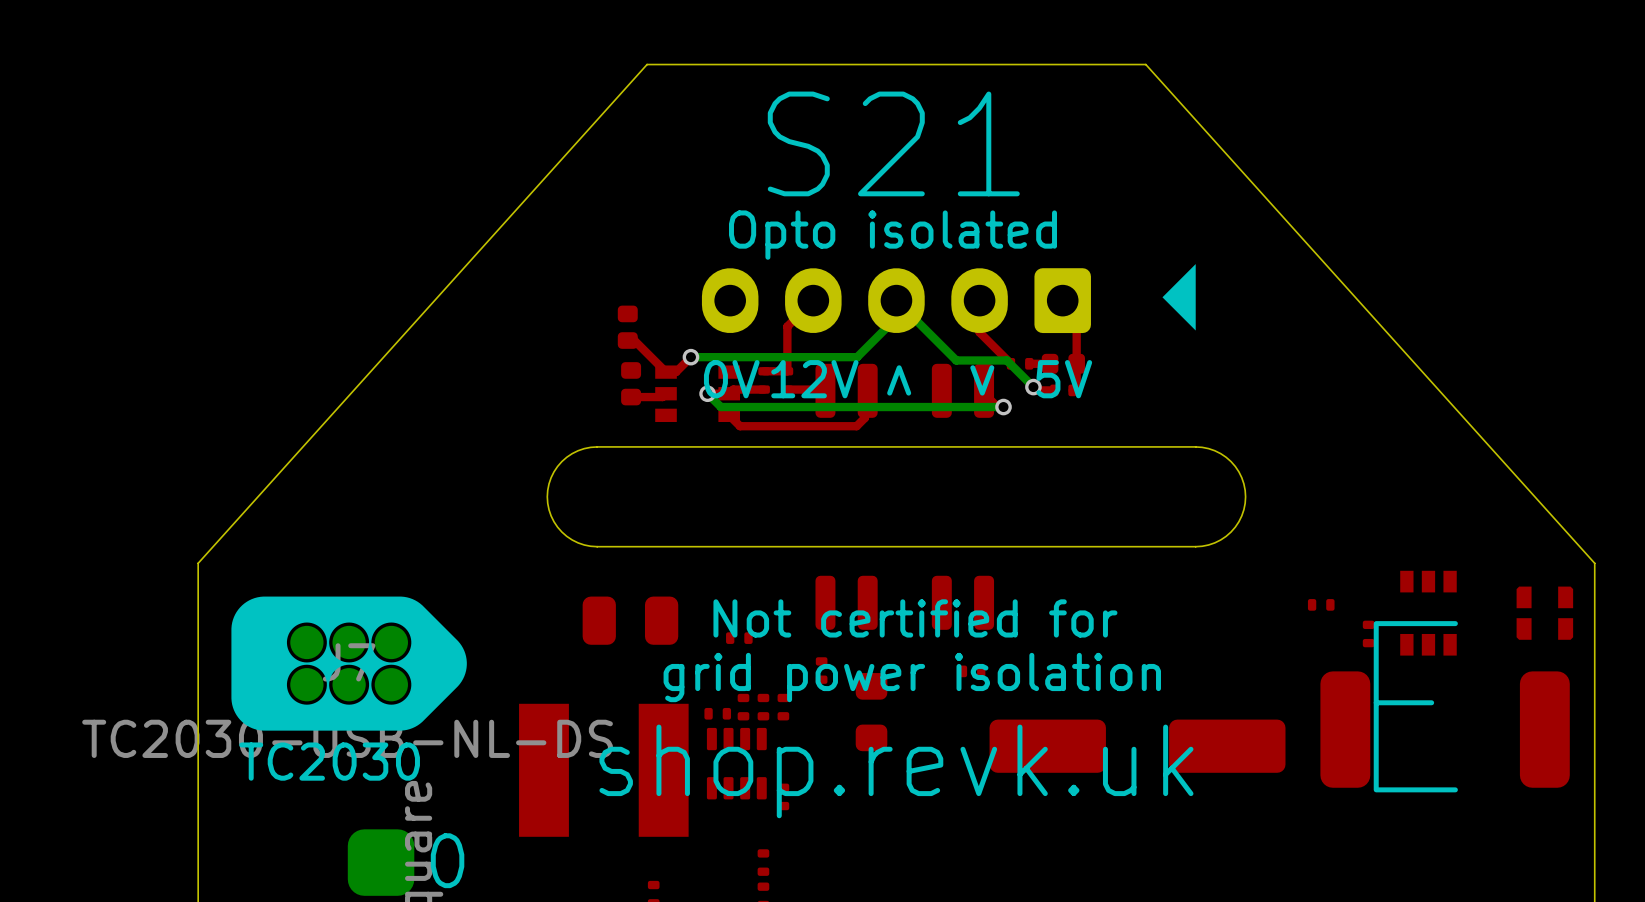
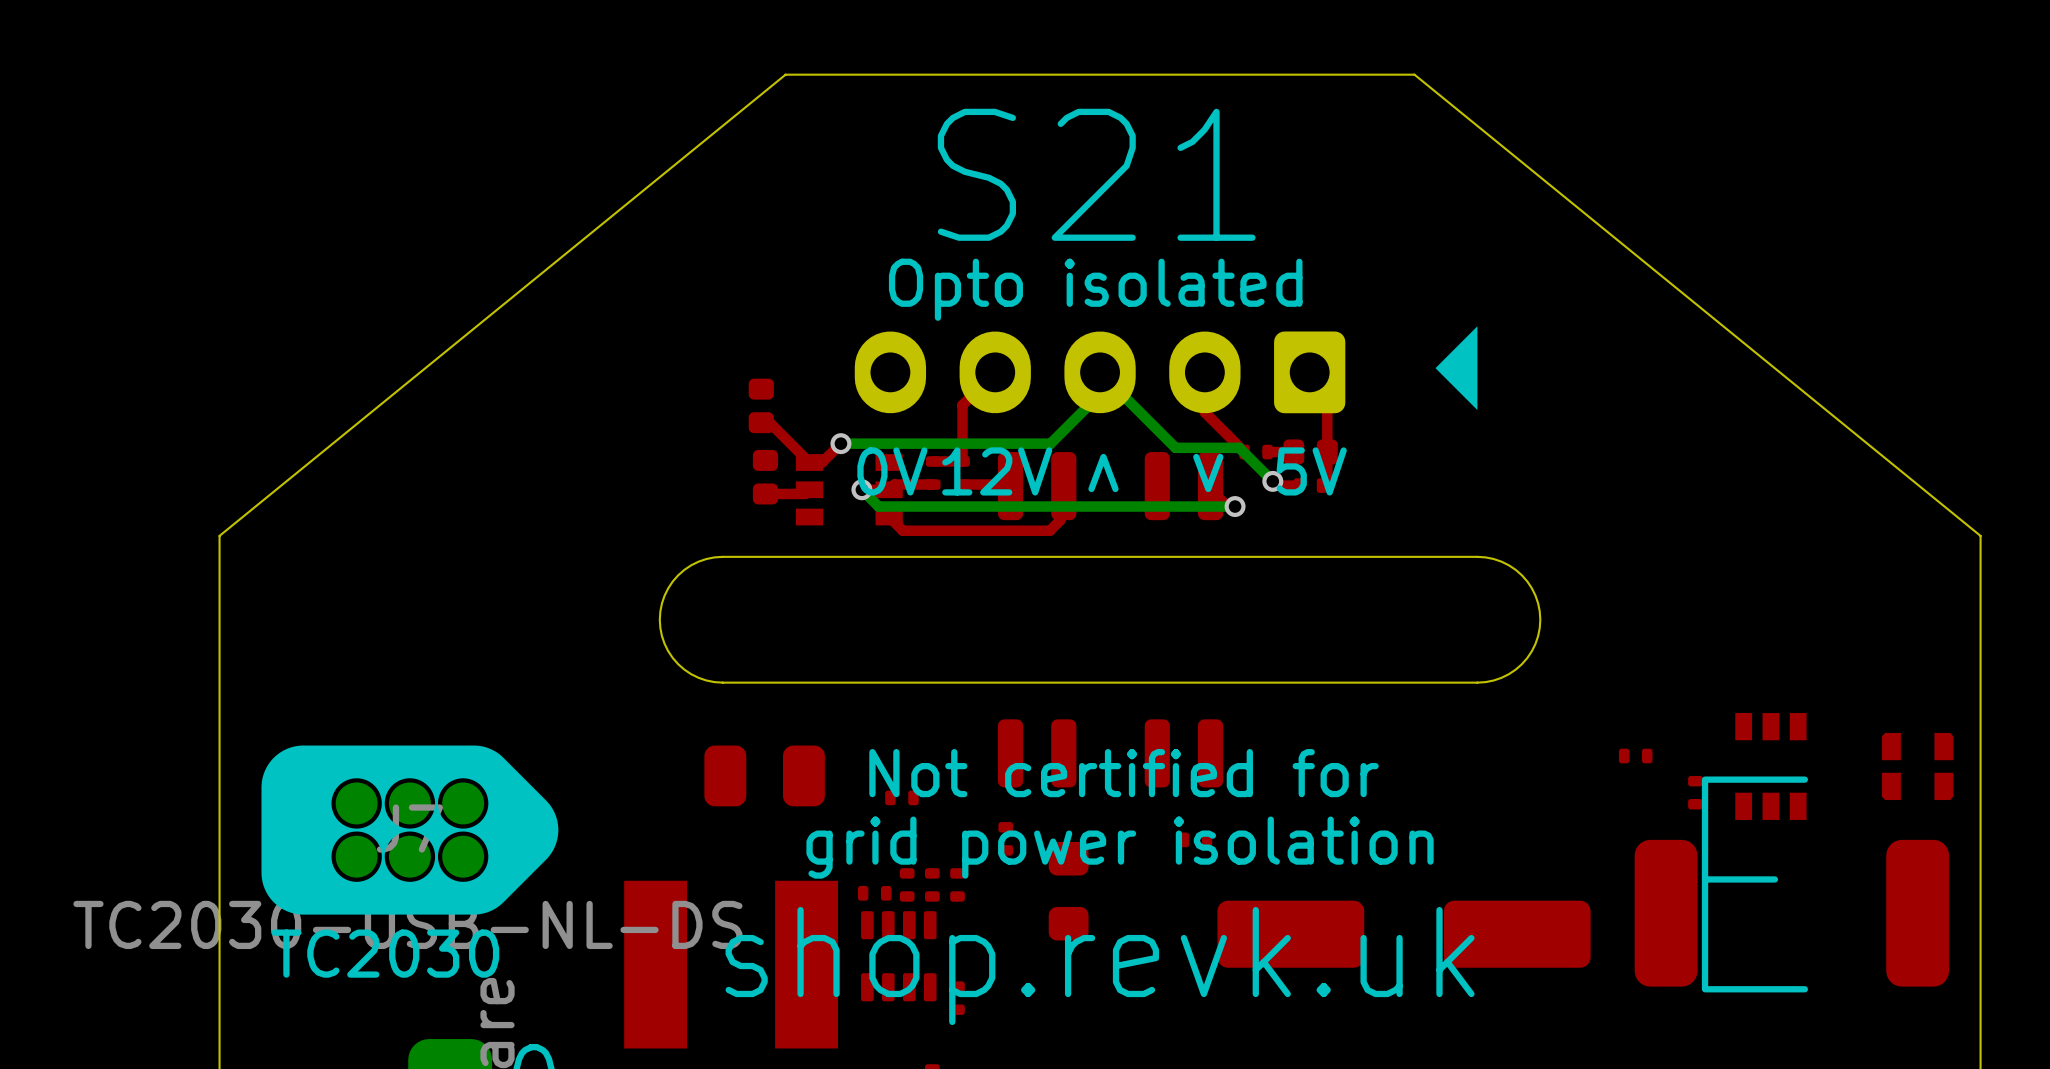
board edge: (647, 64) (198, 563) -> (785, 74) (219, 535) (219, 703)
board edge: (1145, 64) (1594, 563) -> (1414, 74) (1980, 535) (1980, 703)

